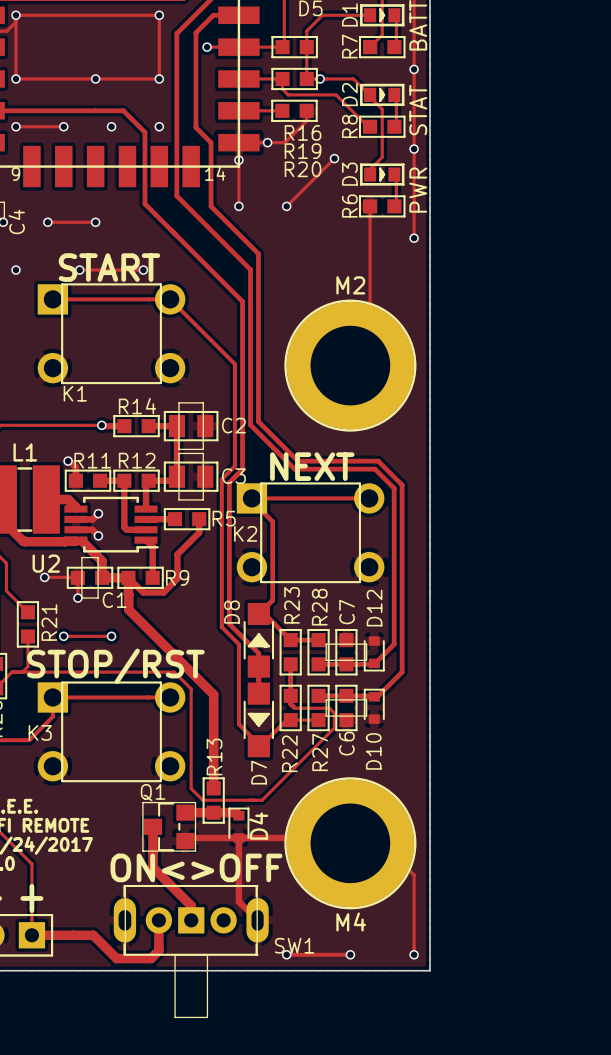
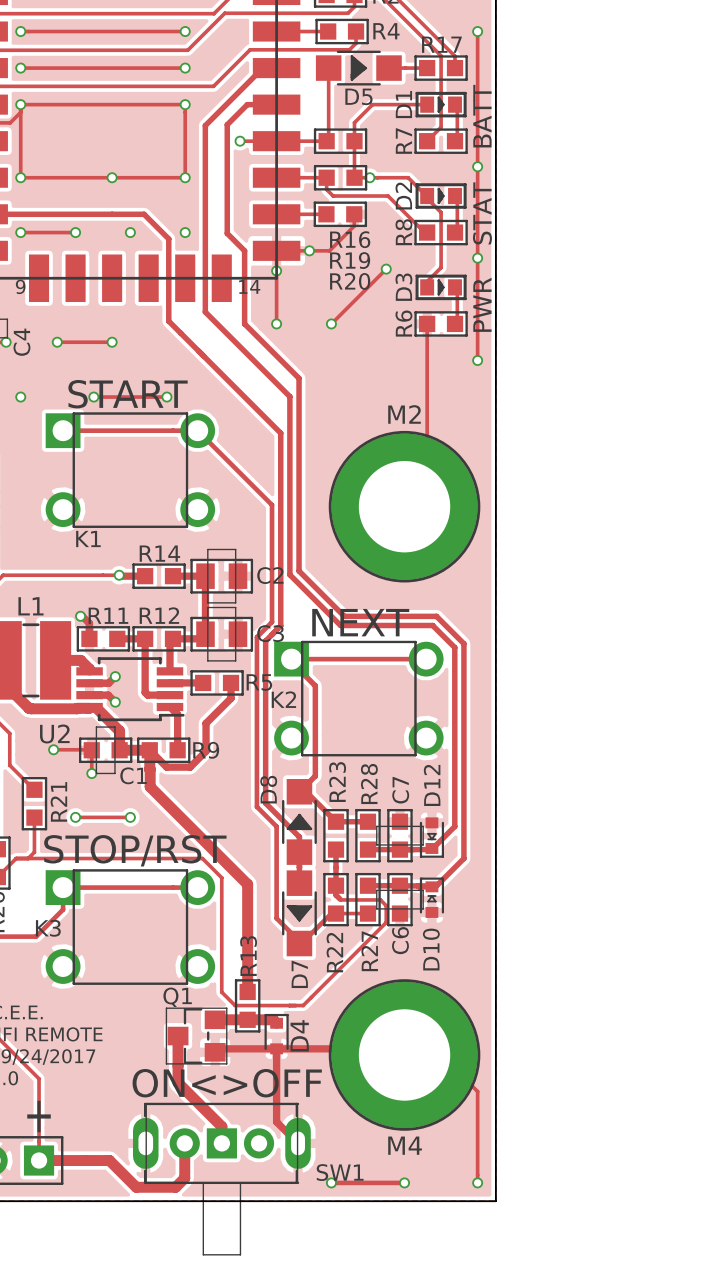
D12 footprint: [363, 636, 385, 672] -> [419, 817, 445, 858]
D10 footprint: [363, 688, 385, 724] -> [419, 877, 445, 918]

